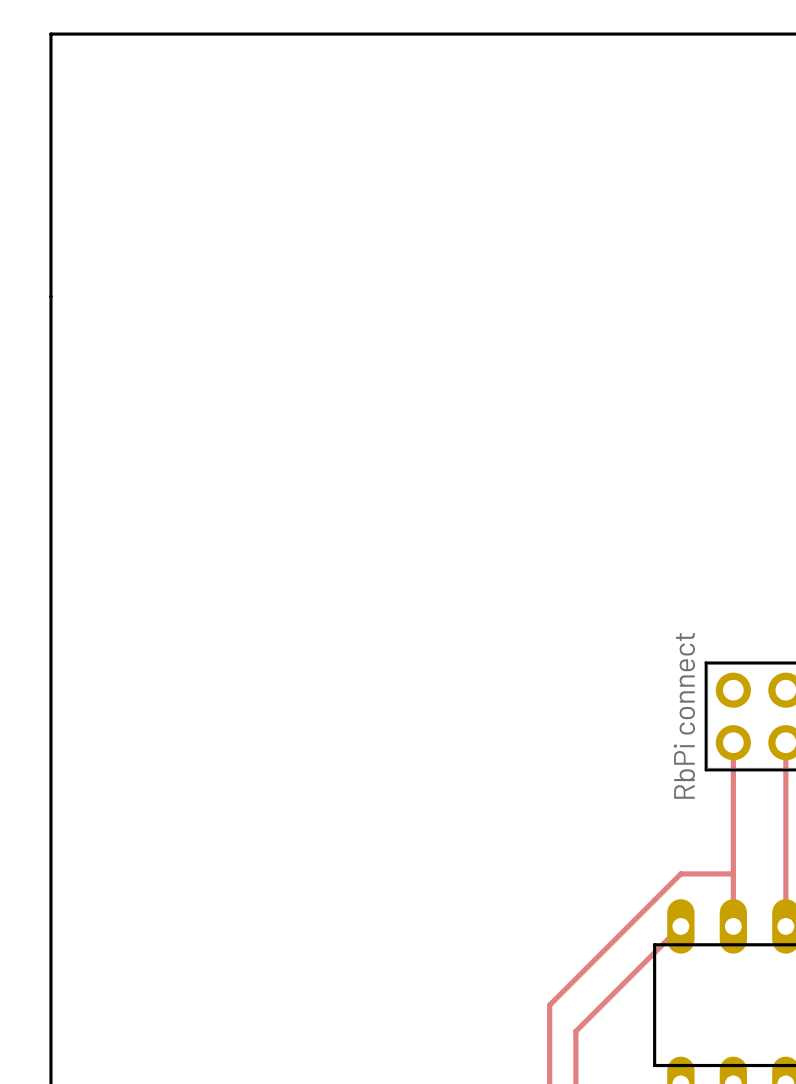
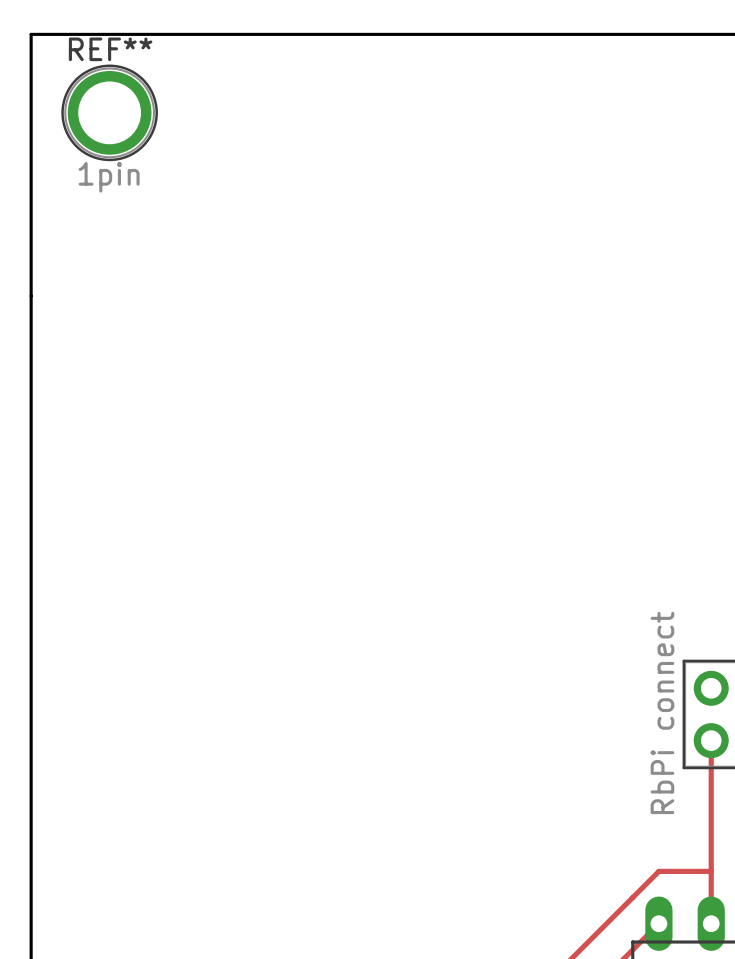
REF**: none -> 1pin (109, 112)

